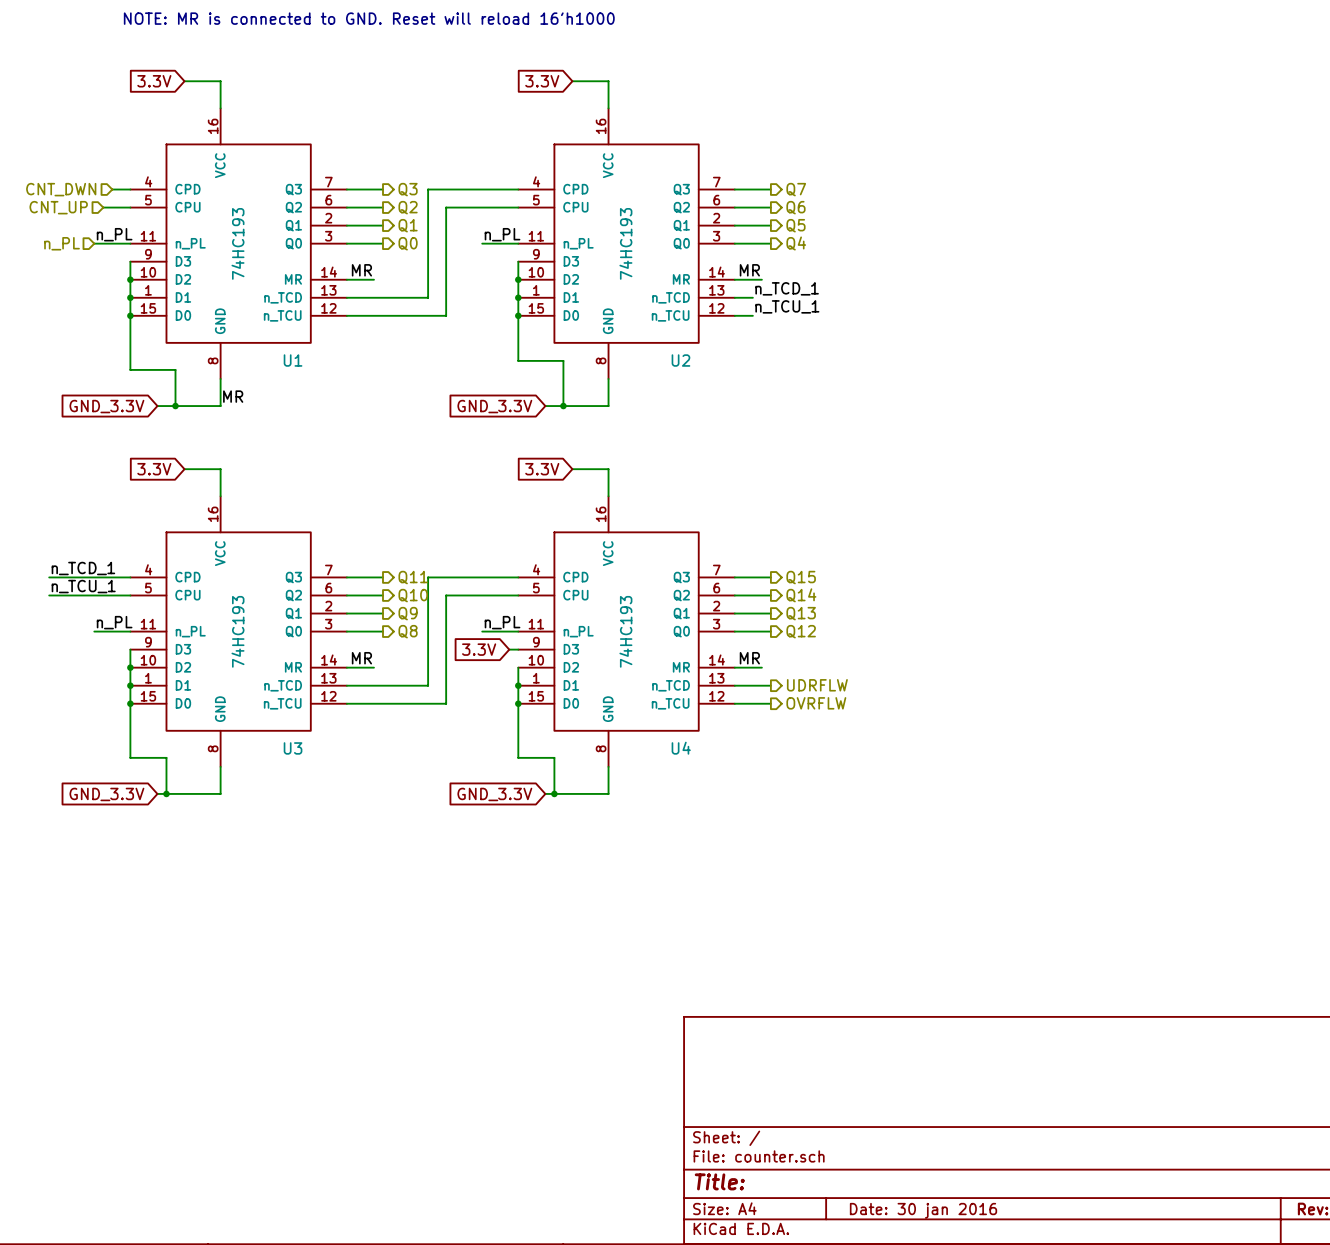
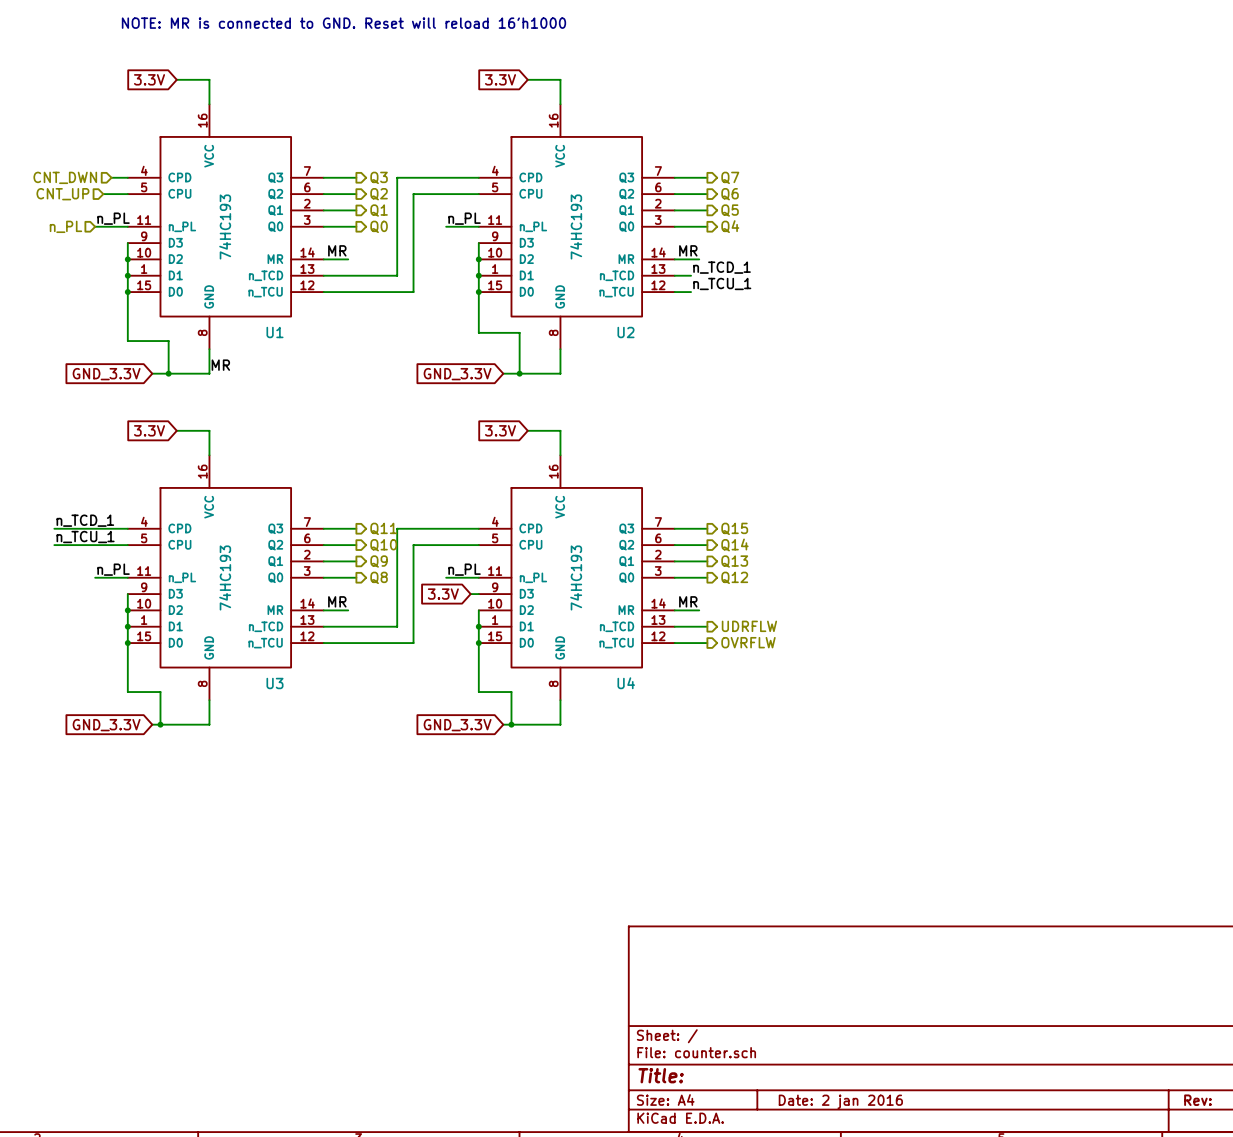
title block: Date: 30 jan 2016 (923, 1210) -> Date: 2 jan 2016 (840, 1101)

